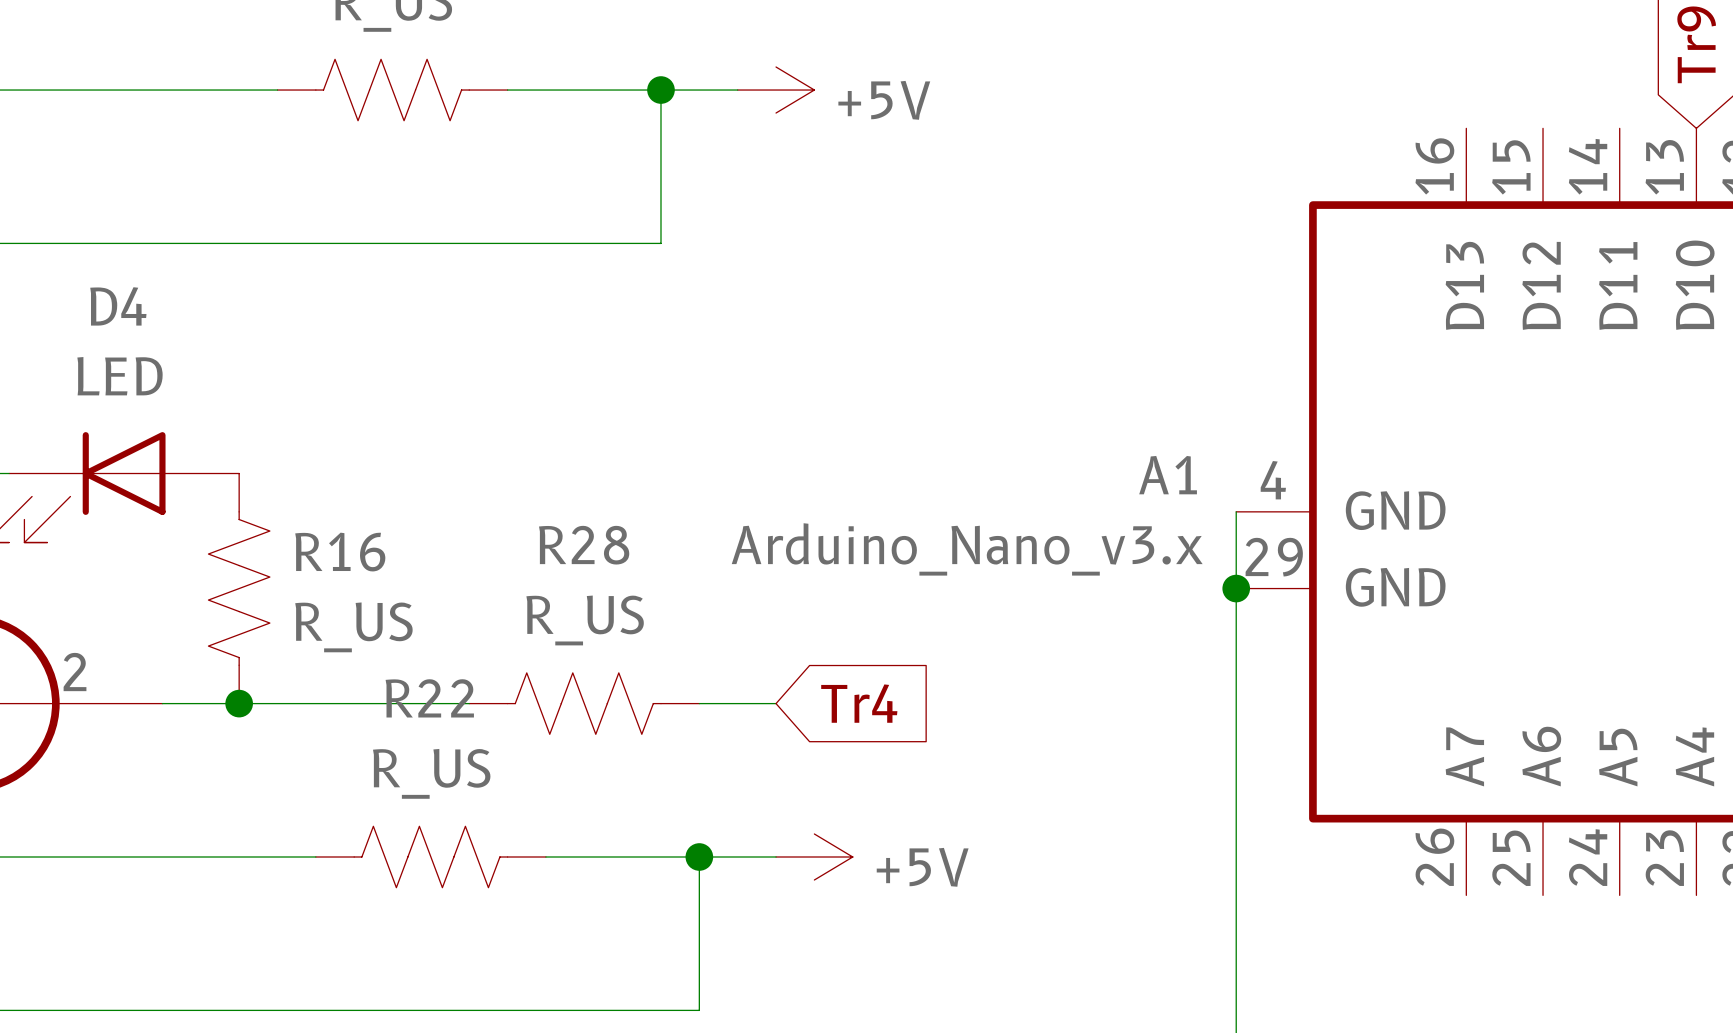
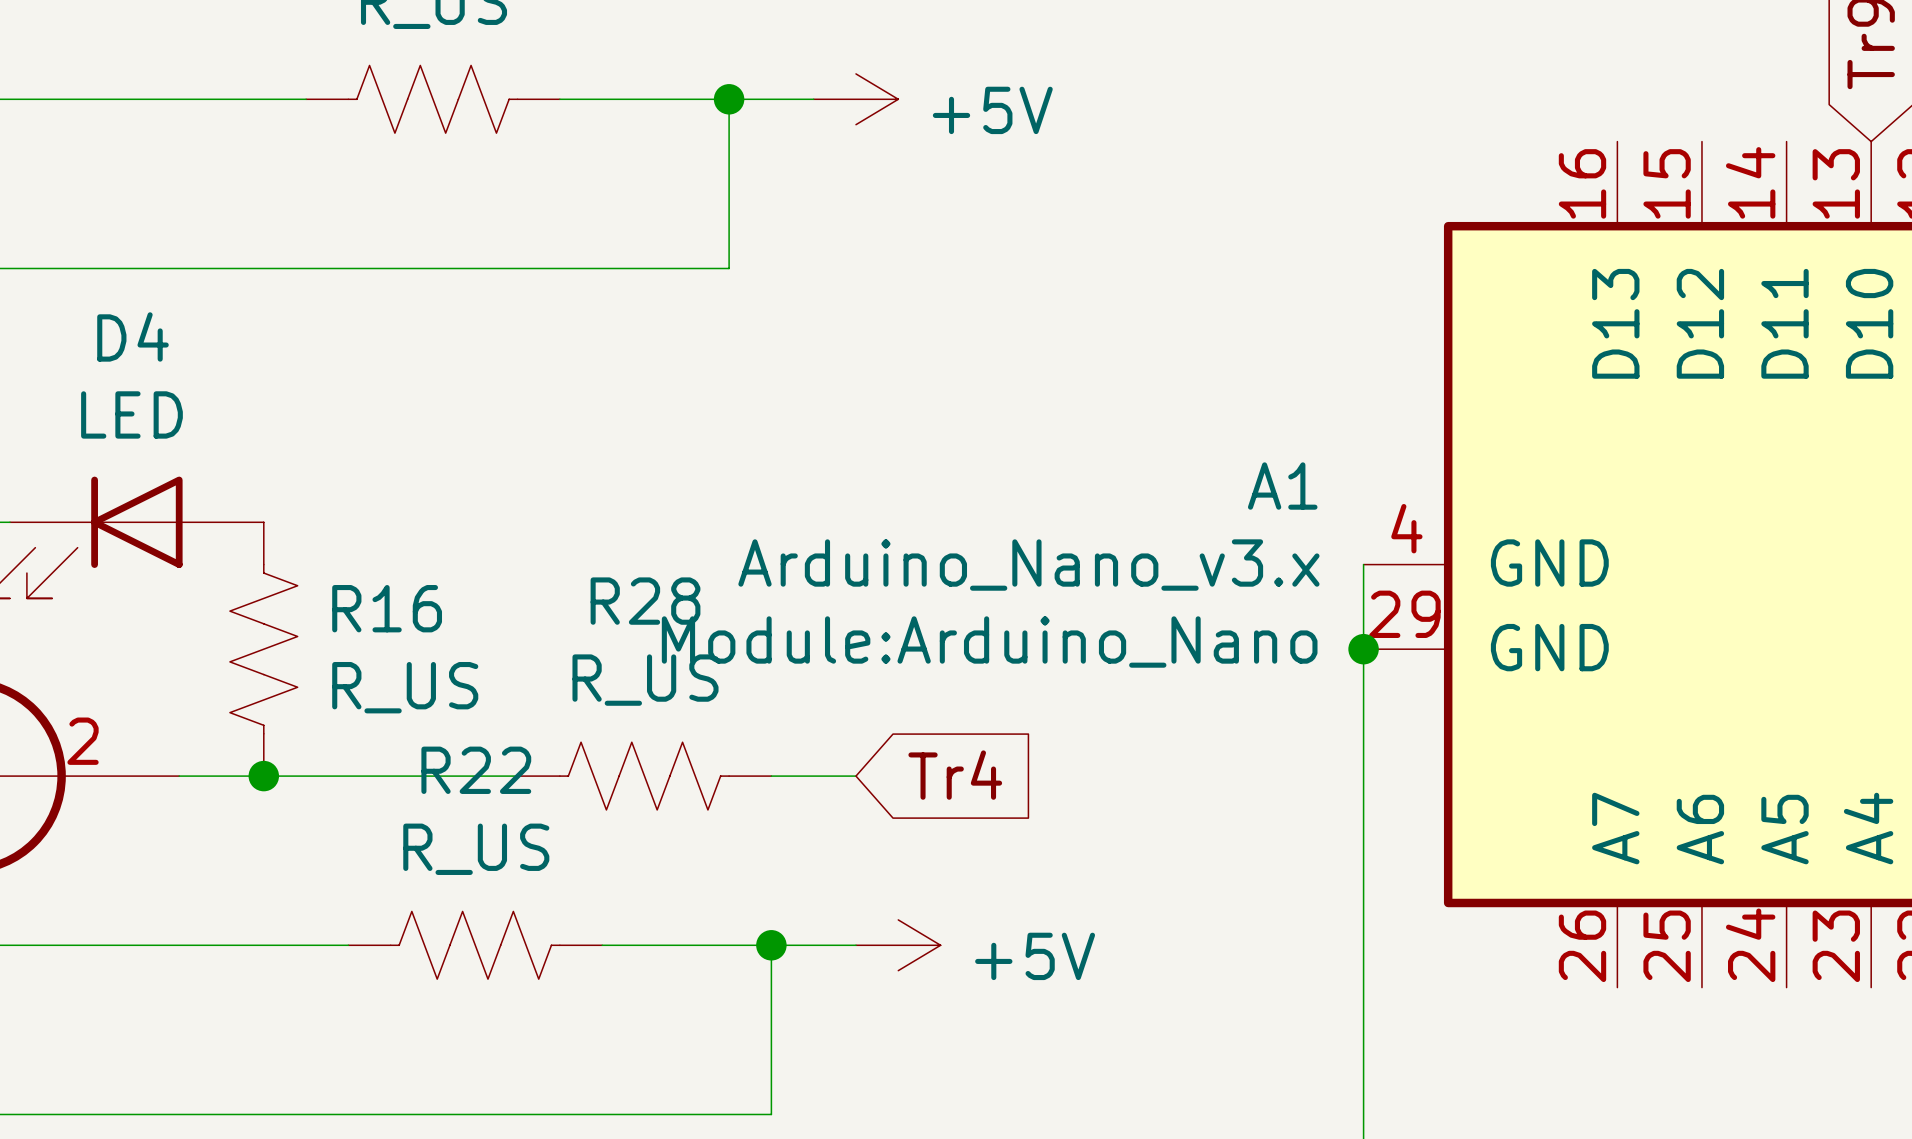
A1 name position: A1 (1168, 475) -> A1 (1282, 486)
A1 value position: Arduino_Nano_v3.x (967, 549) -> Arduino_Nano_v3.x (1028, 565)
A1 text: none -> Module:Arduino_Nano (989, 642)

